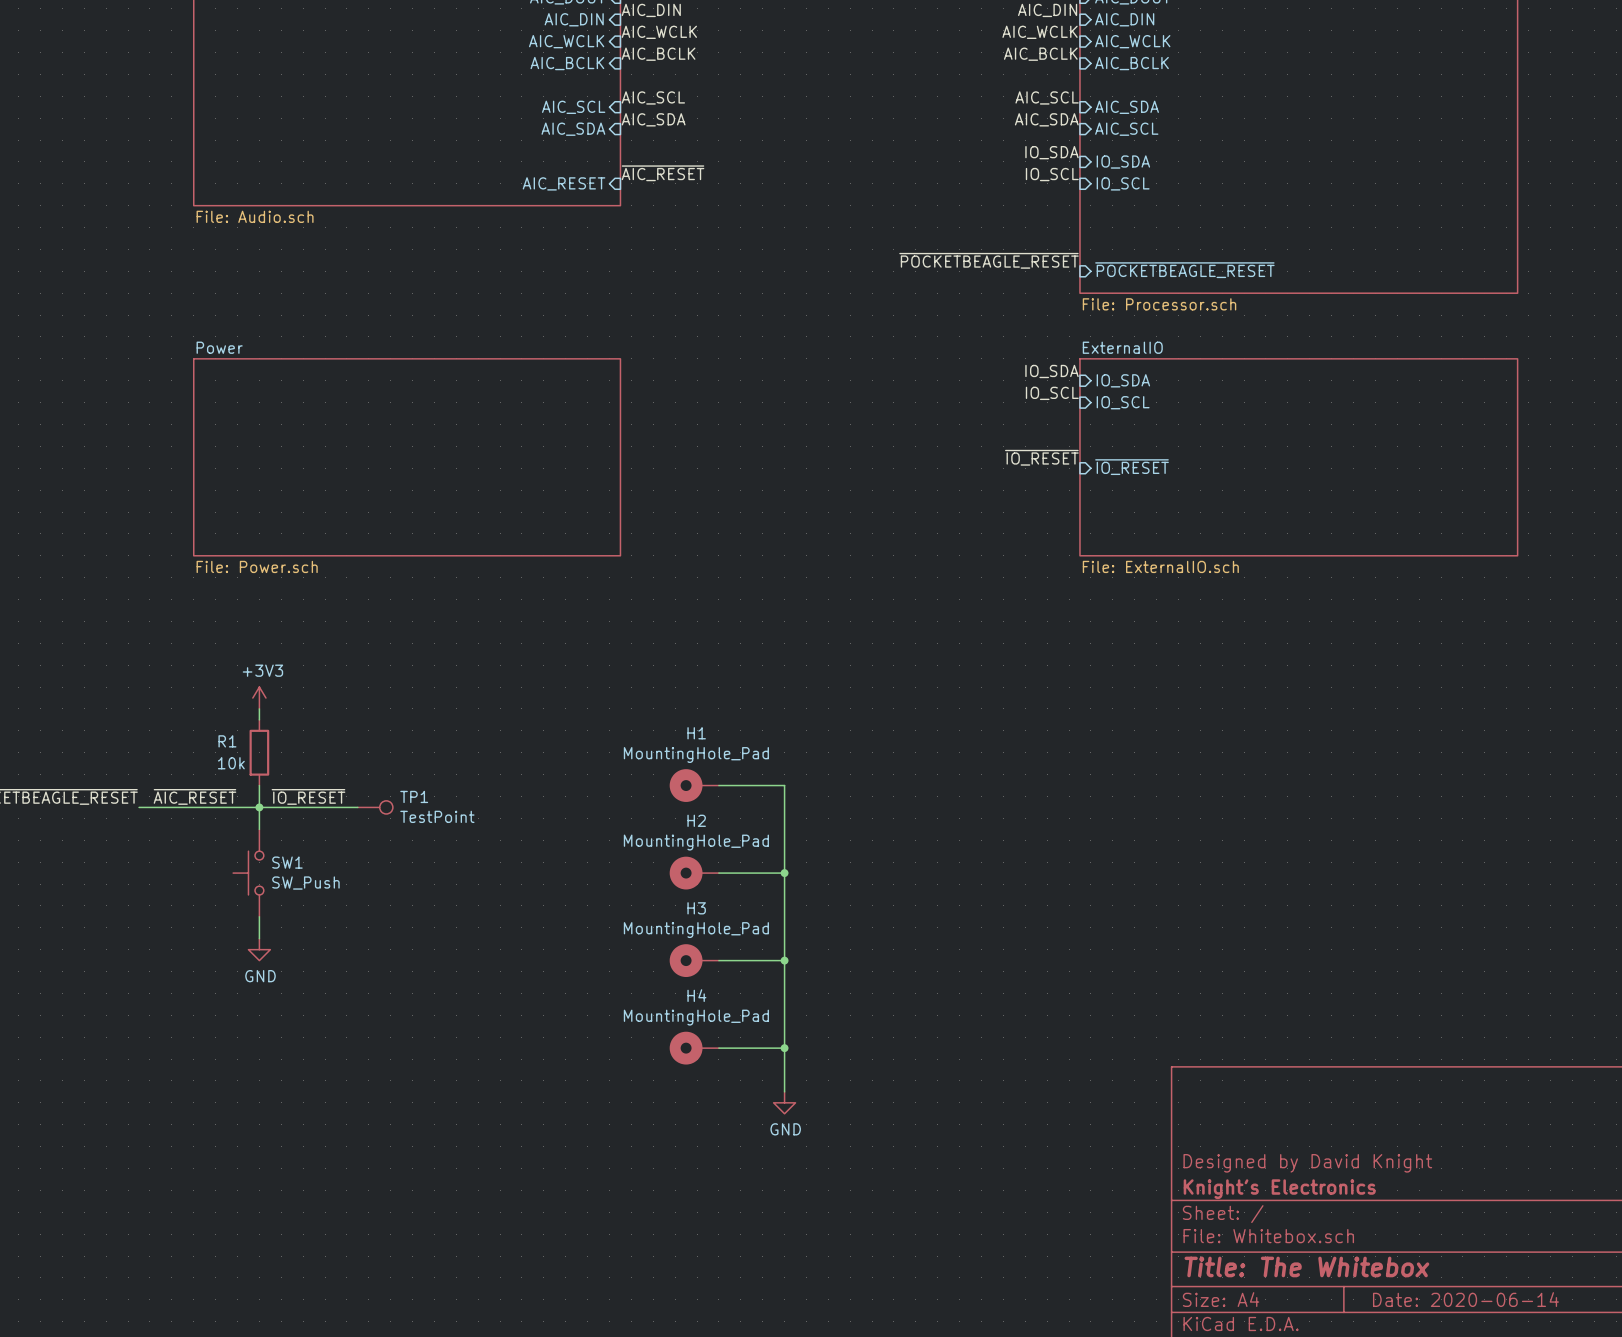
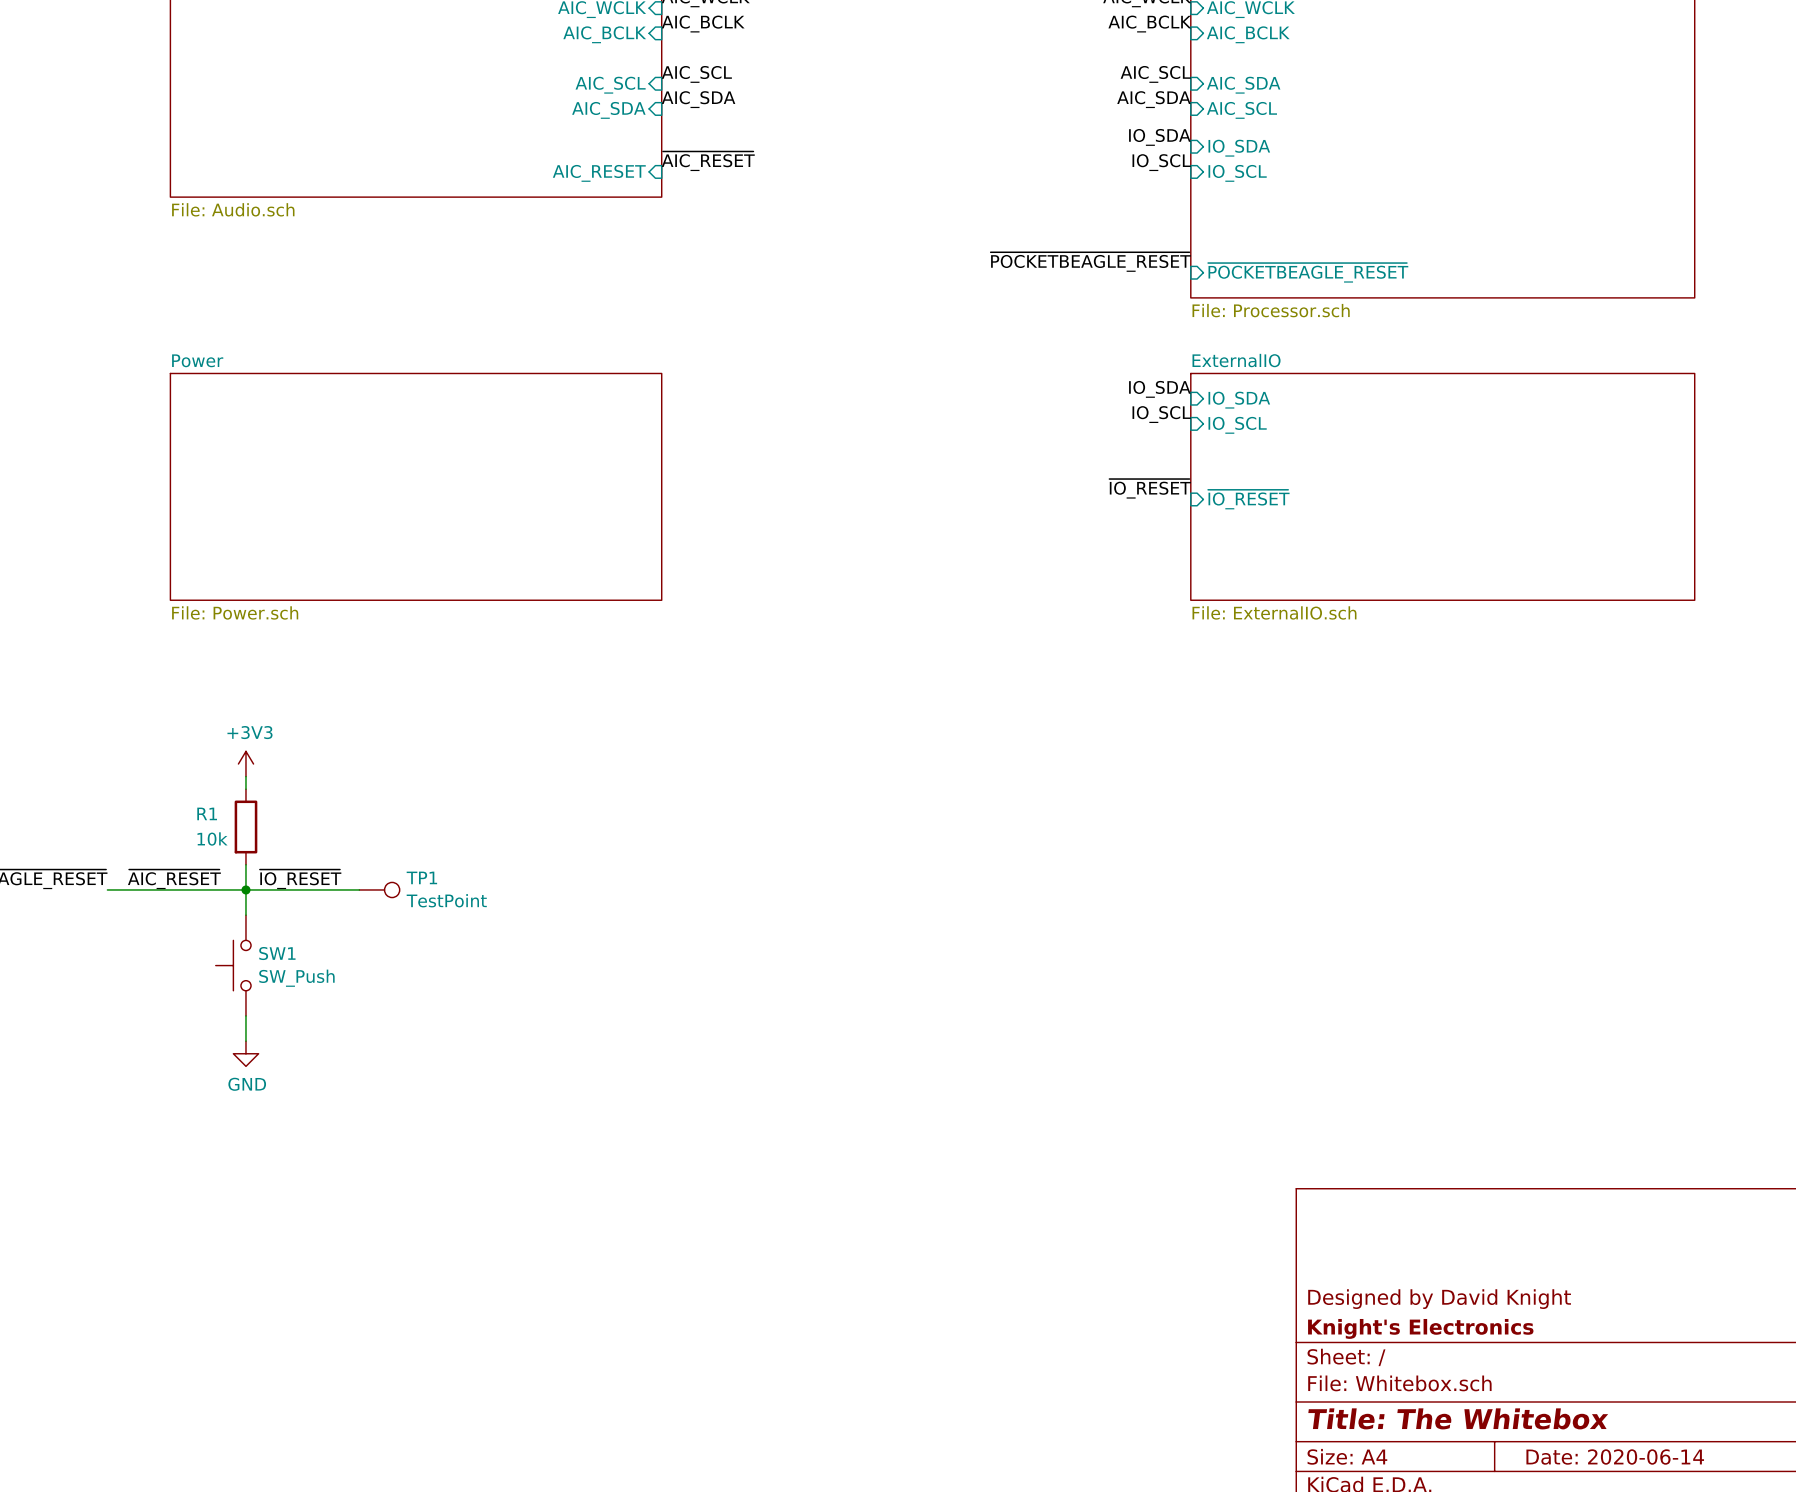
H1: MountingHole_Pad (694, 785) -> none
wire: (718, 785) (784, 785) (784, 1091) -> none
H2: MountingHole_Pad (694, 873) -> none
wire: (718, 873) (784, 873) -> none
junction: (784, 873) -> none
H3: MountingHole_Pad (694, 960) -> none
wire: (718, 960) (784, 960) -> none
junction: (784, 960) -> none
H4: MountingHole_Pad (694, 1048) -> none
wire: (718, 1048) (784, 1048) -> none
junction: (784, 1048) -> none
power symbol: GND (784, 1102) -> none

